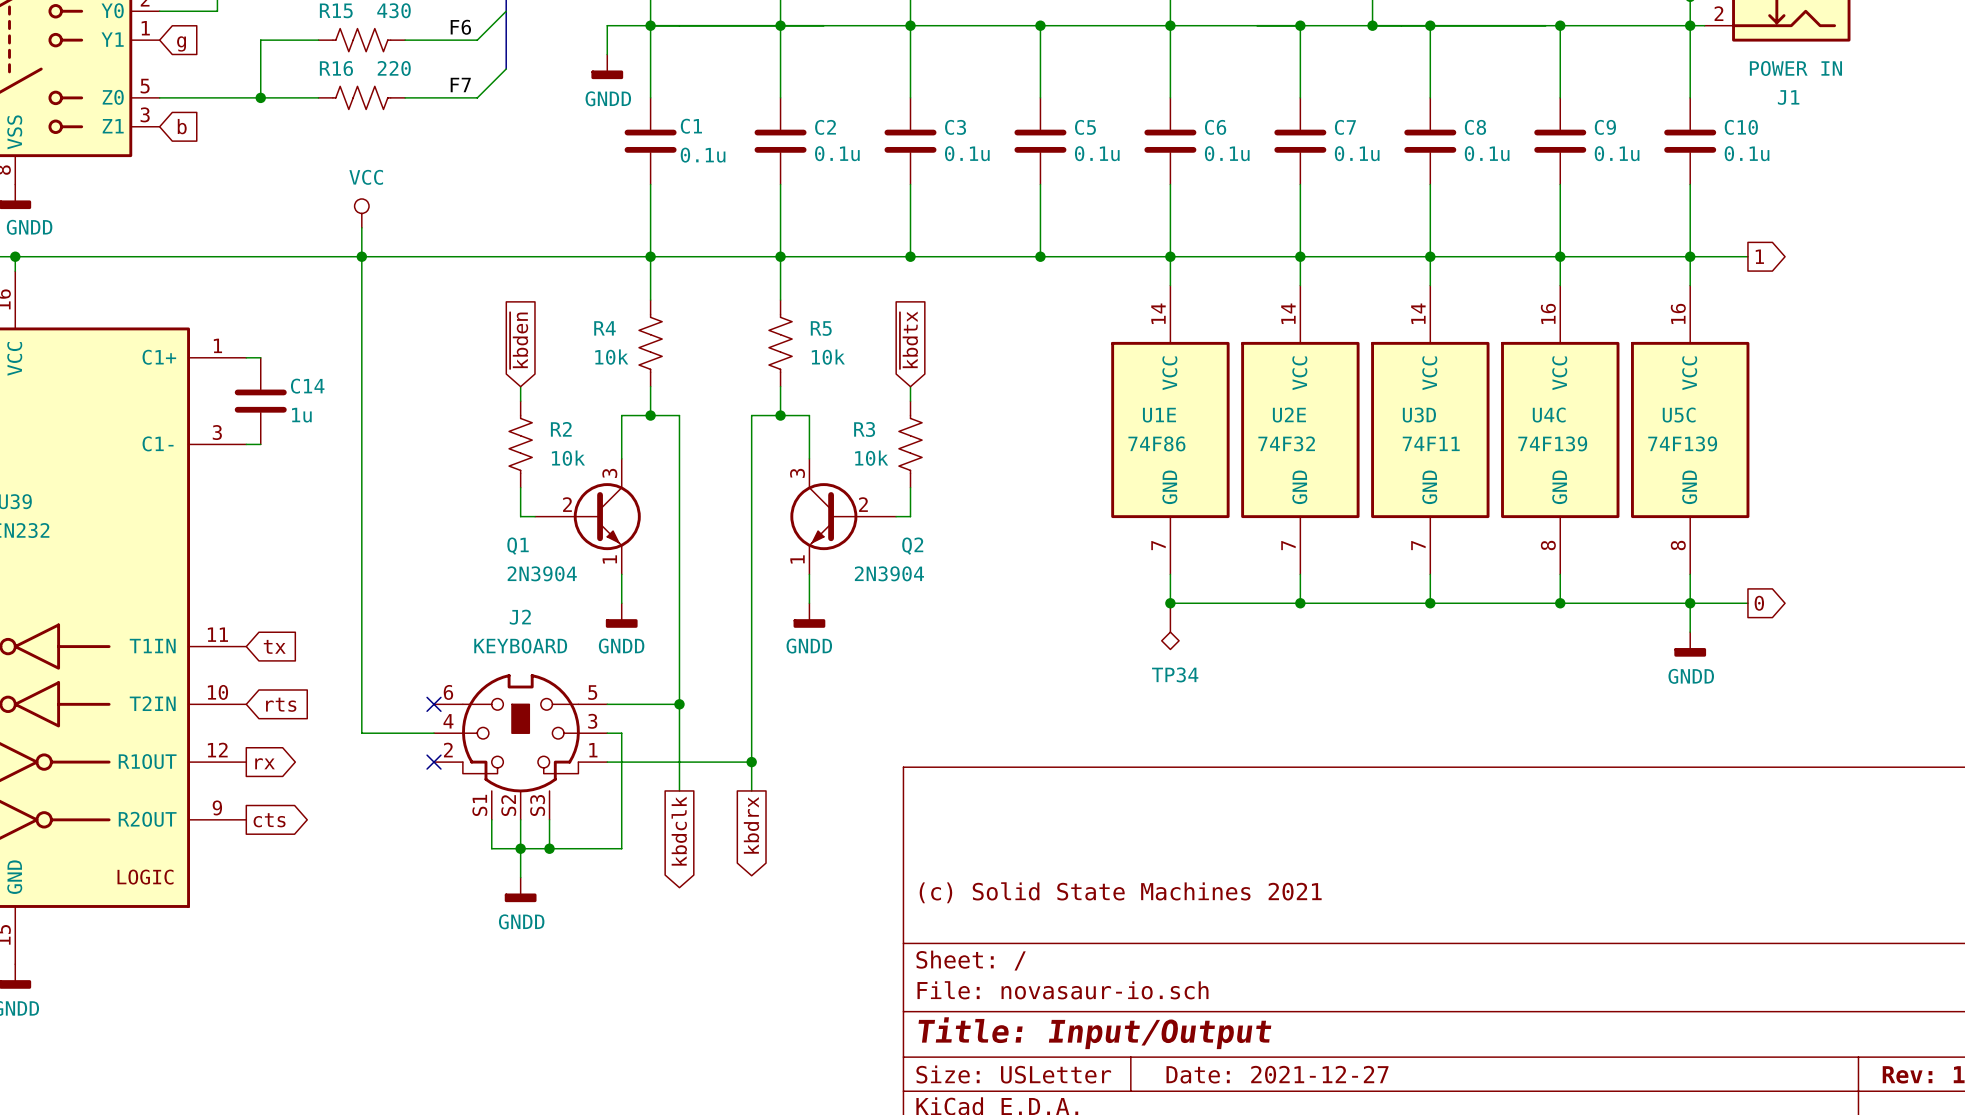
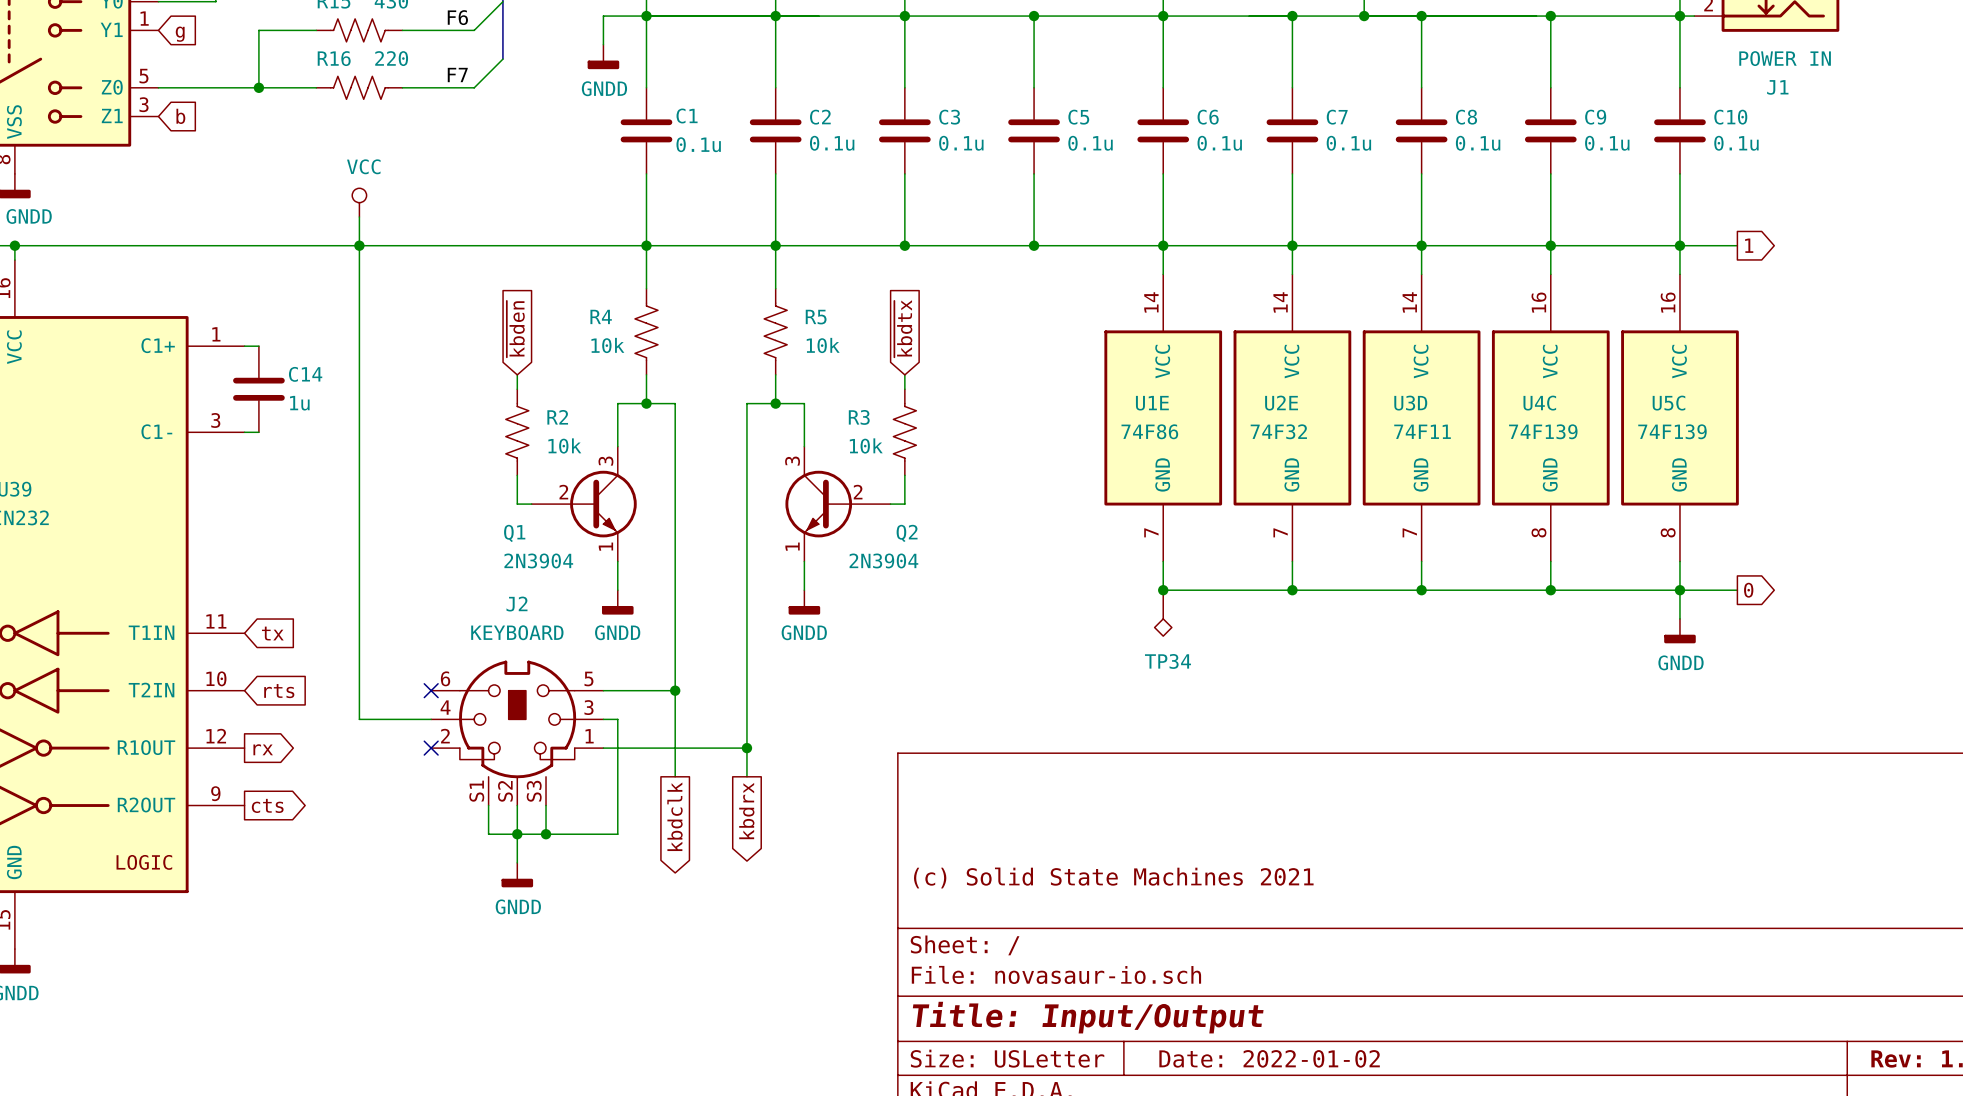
title block: Date: 2021-12-27 (1277, 1074) -> Date: 2022-01-02 (1269, 1058)

